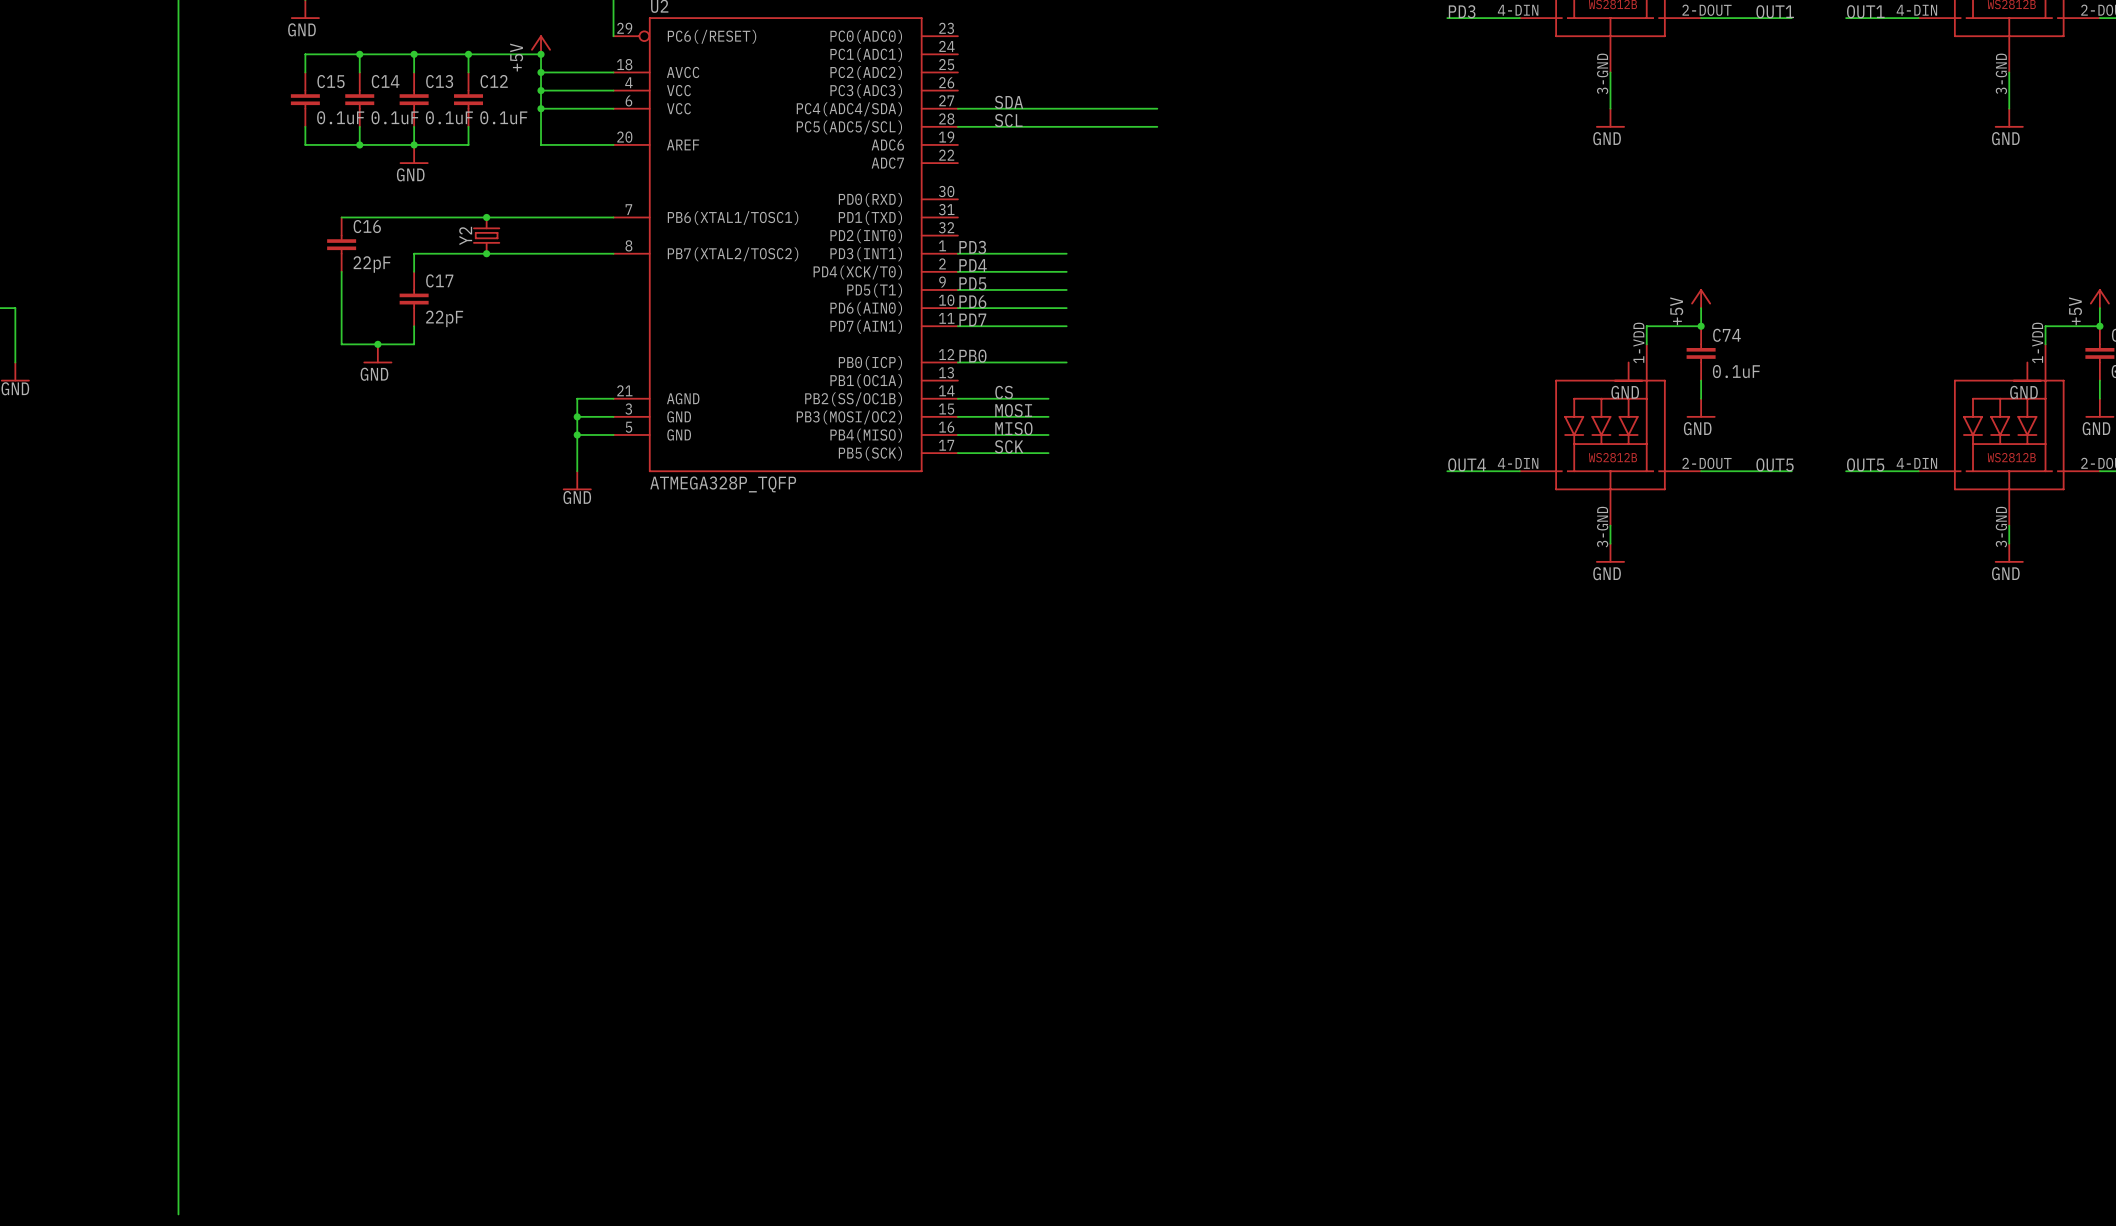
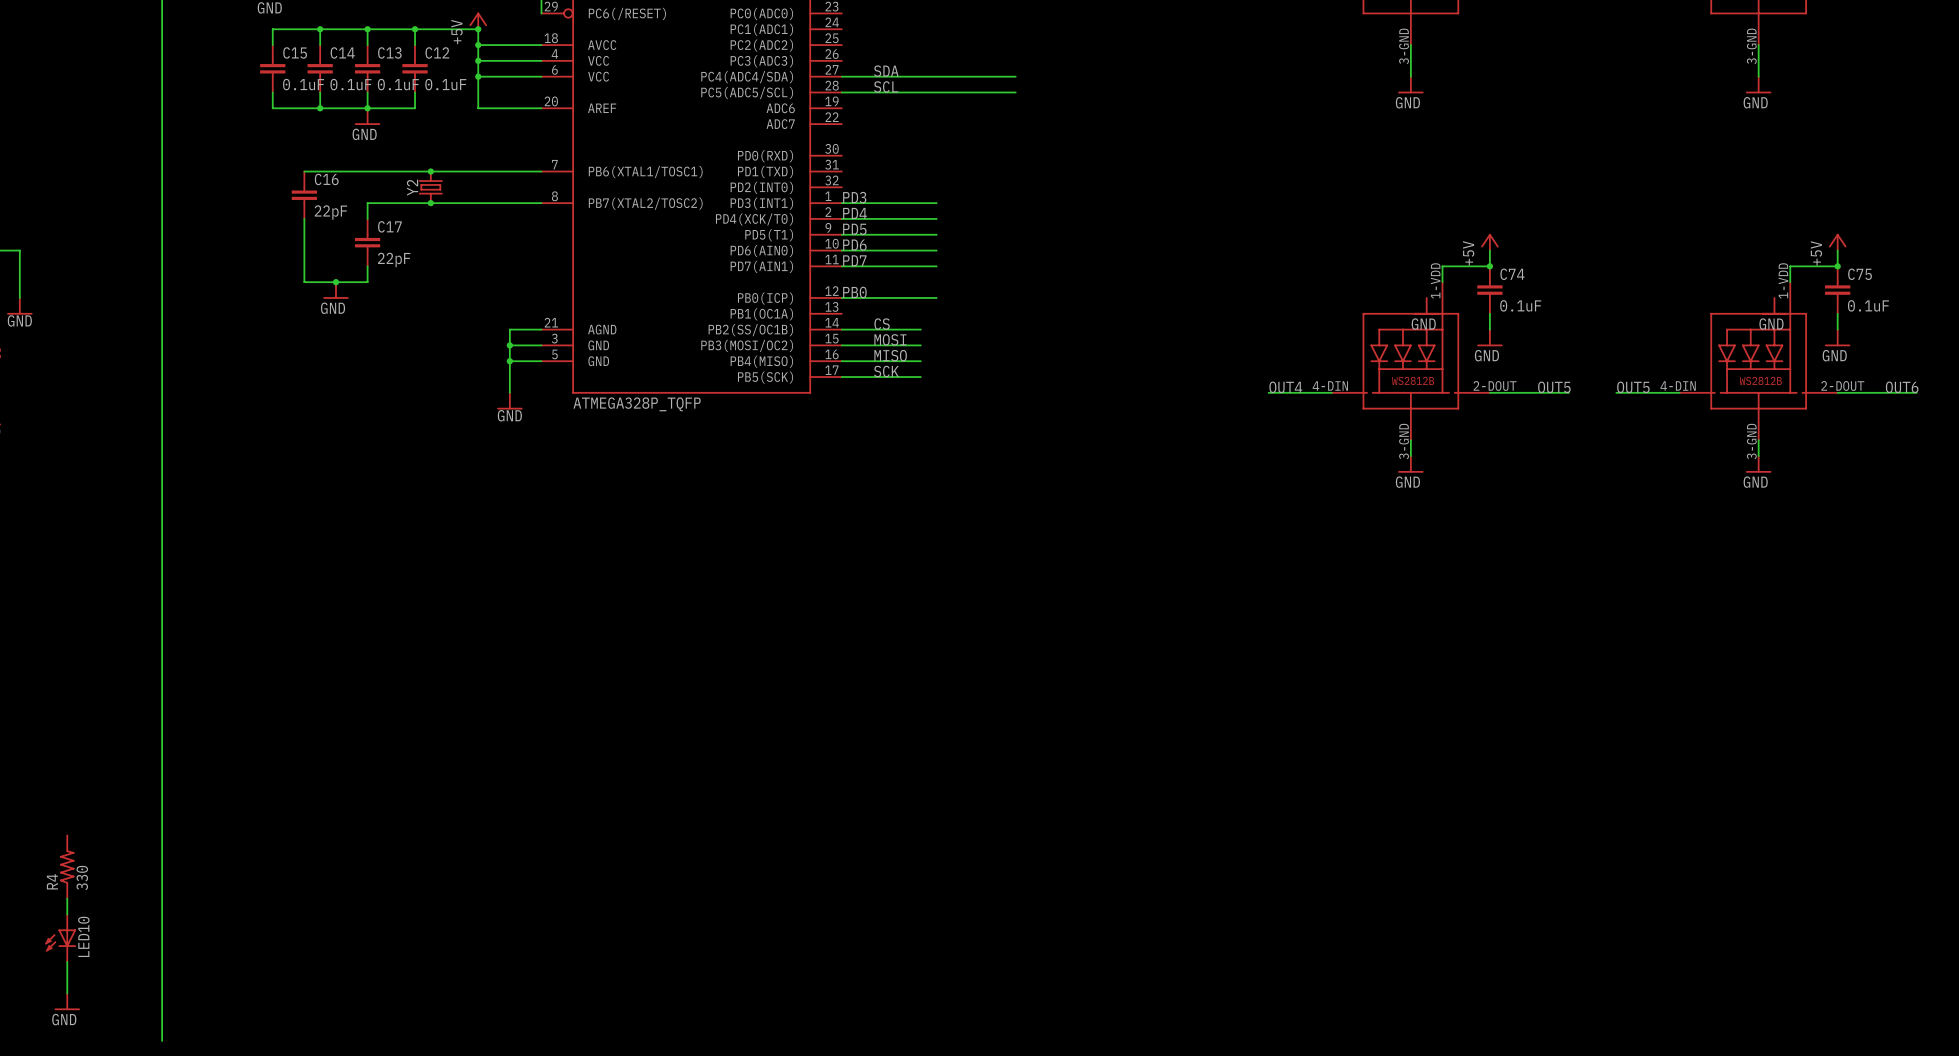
R4: none -> 330 (67, 867)
wire: none -> (67, 898) (67, 914)
LED10: none -> (60, 938)
wire: none -> (67, 961) (67, 993)
power symbol: none -> GND (67, 1001)

